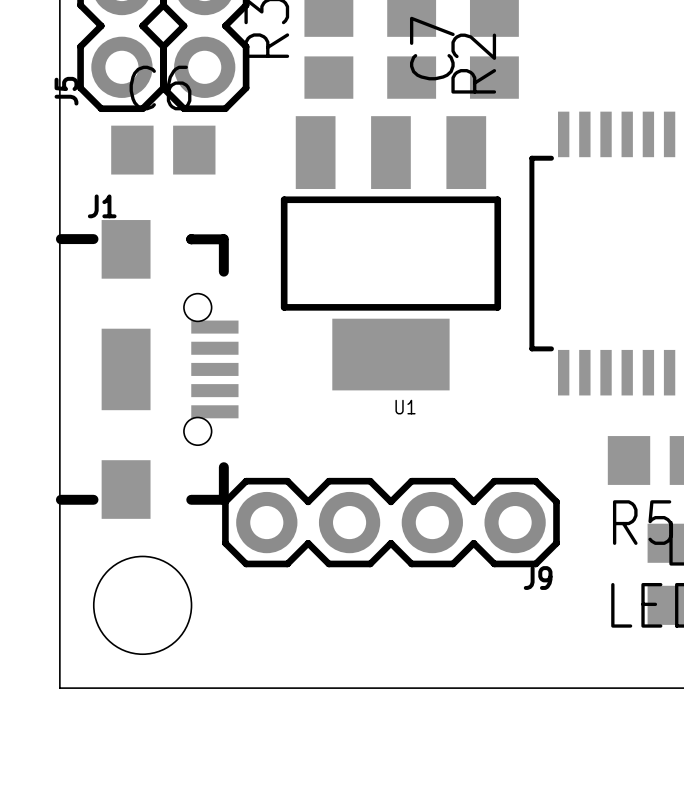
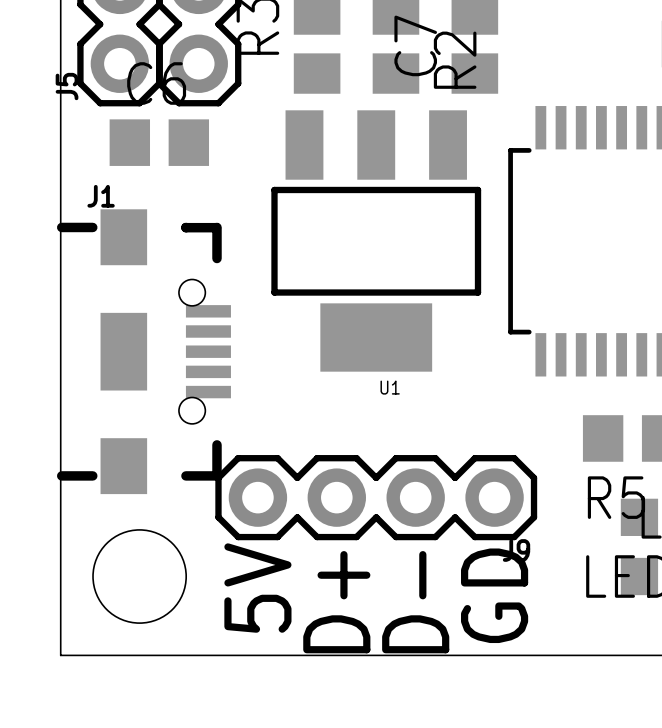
text: none -> 5V (257, 588)
text: none -> GD (494, 595)
text: none -> D+ (336, 602)
text: none -> D- (415, 602)

